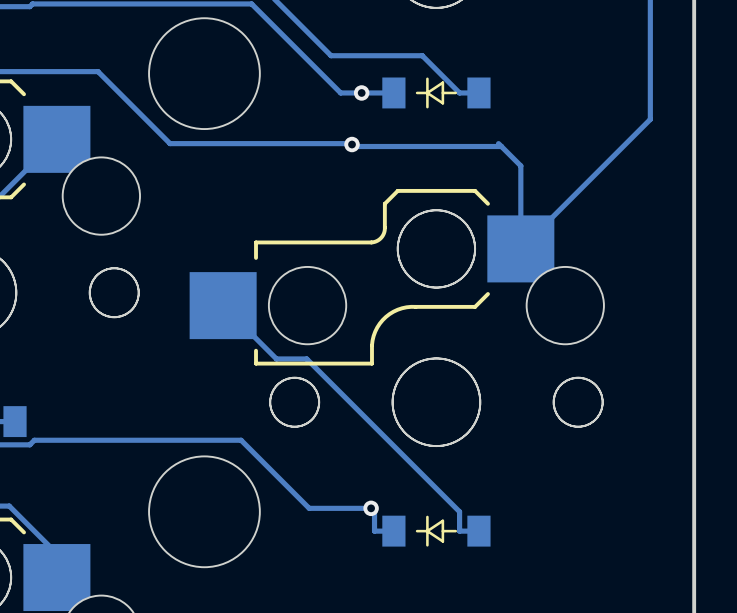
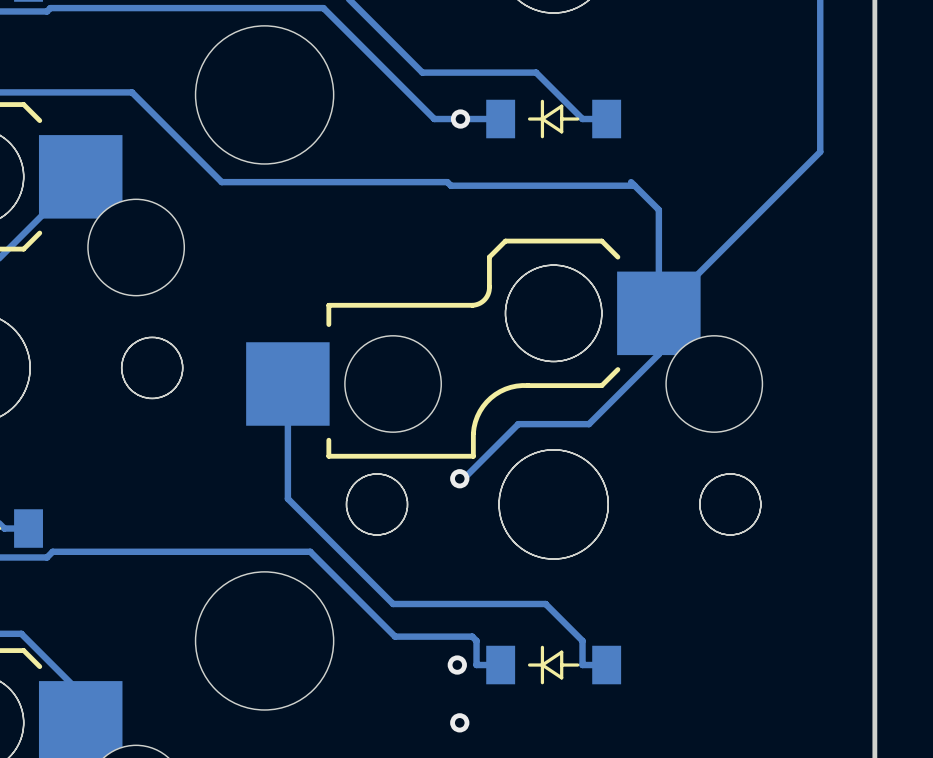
via: (352, 144) -> none
track: none -> (658, 313) (658, 354) (589, 424) (518, 424) (463, 478) (459, 478)
track: (223, 305) (276, 358) (306, 358) (429, 482) -> (287, 383) (287, 498) (393, 604) (545, 604)
via: none -> (459, 478)
via position: (371, 508) -> (457, 665)
via: none -> (459, 722)

